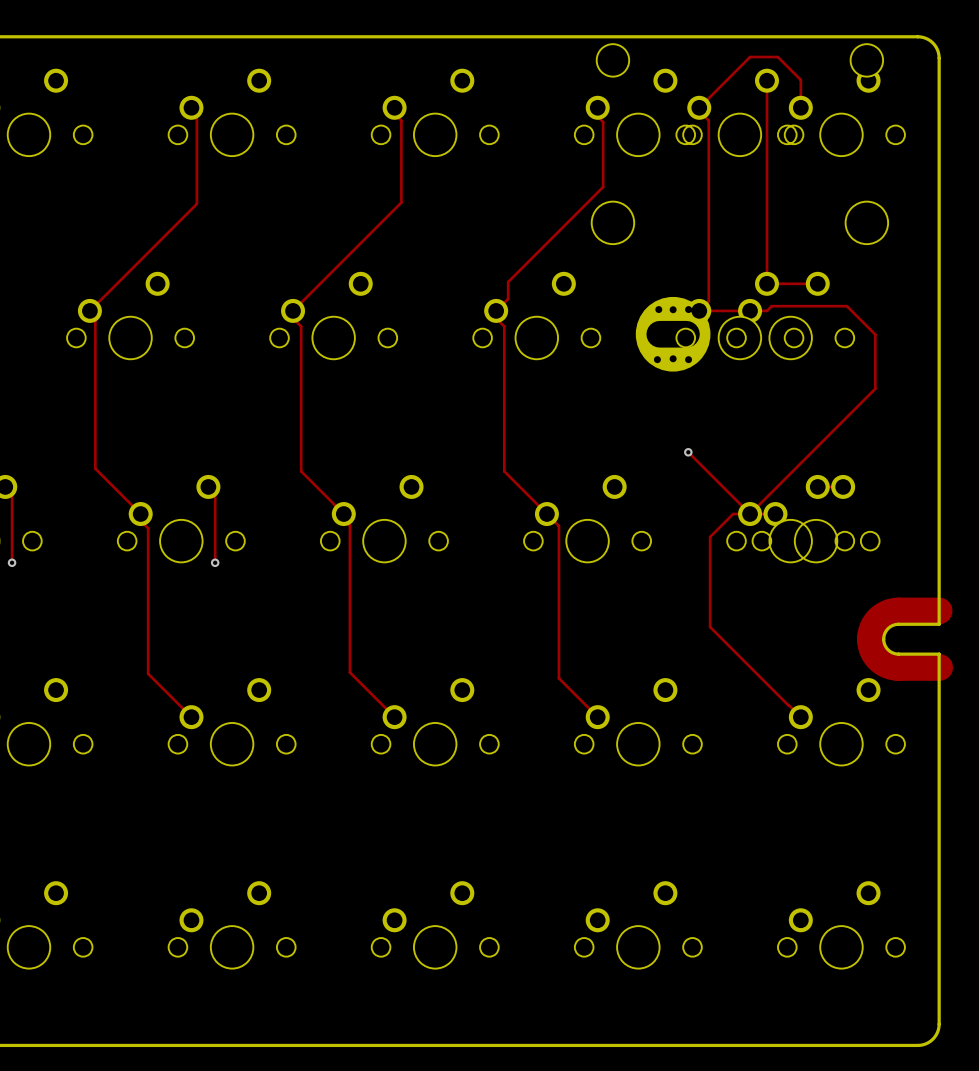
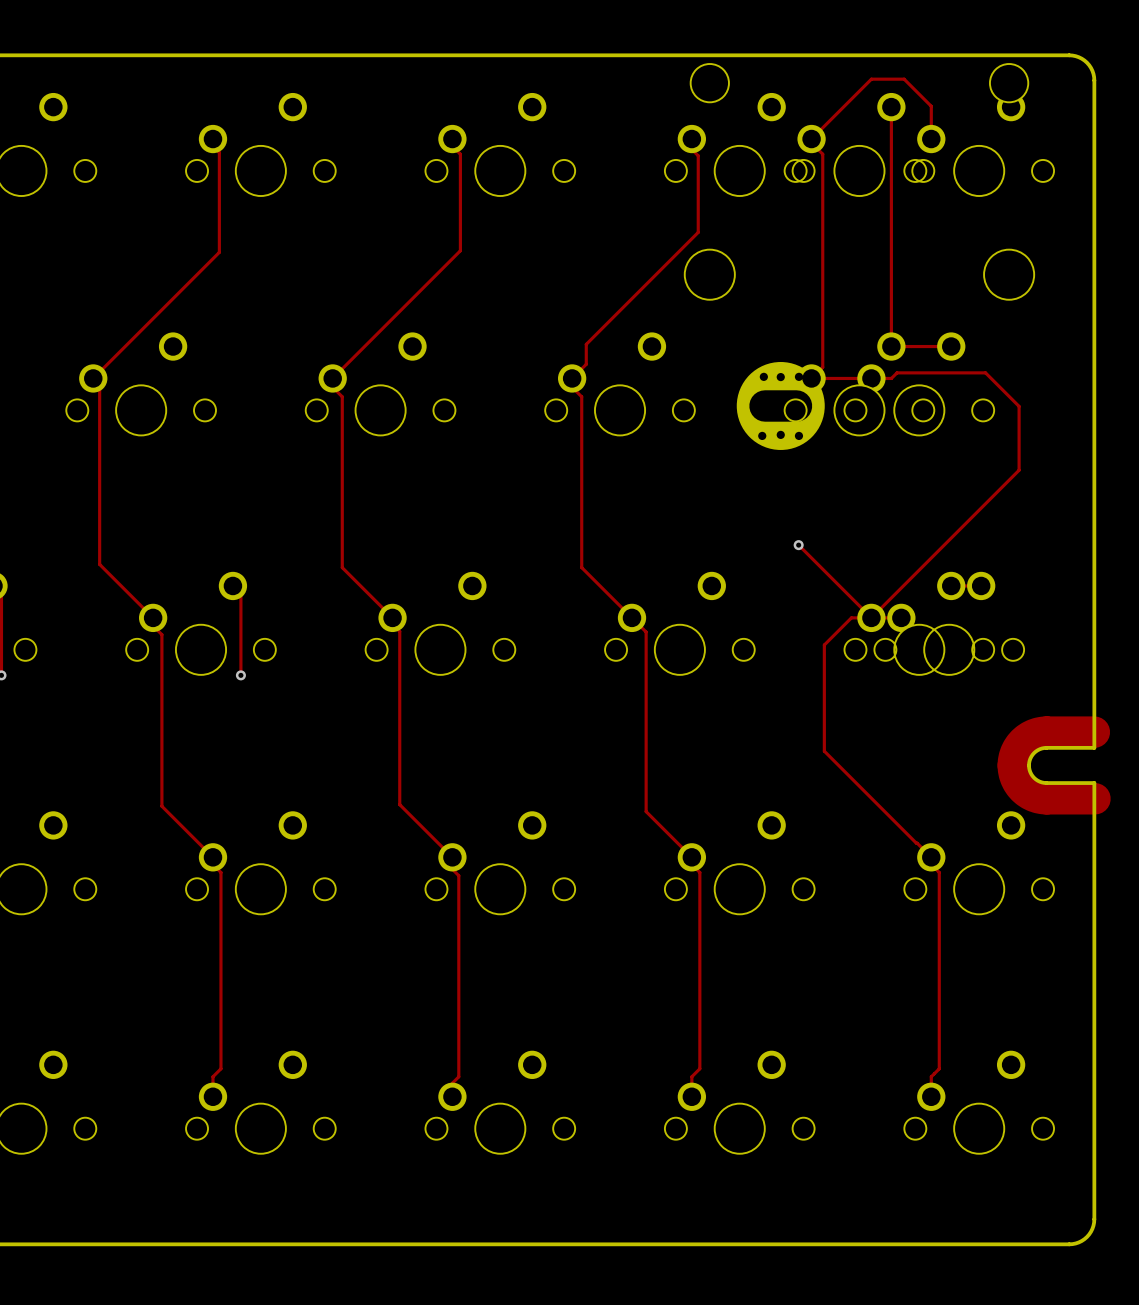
track: none -> (212, 857) (212, 864) (220, 872) (220, 1068) (212, 1076) (212, 1096)
track: none -> (452, 857) (452, 869) (458, 875) (458, 1076) (452, 1083) (452, 1096)
track: none -> (691, 857) (691, 864) (699, 872) (699, 1068) (691, 1076) (691, 1096)
track: none -> (931, 864) (939, 872) (939, 1068) (931, 1076) (931, 1096)

